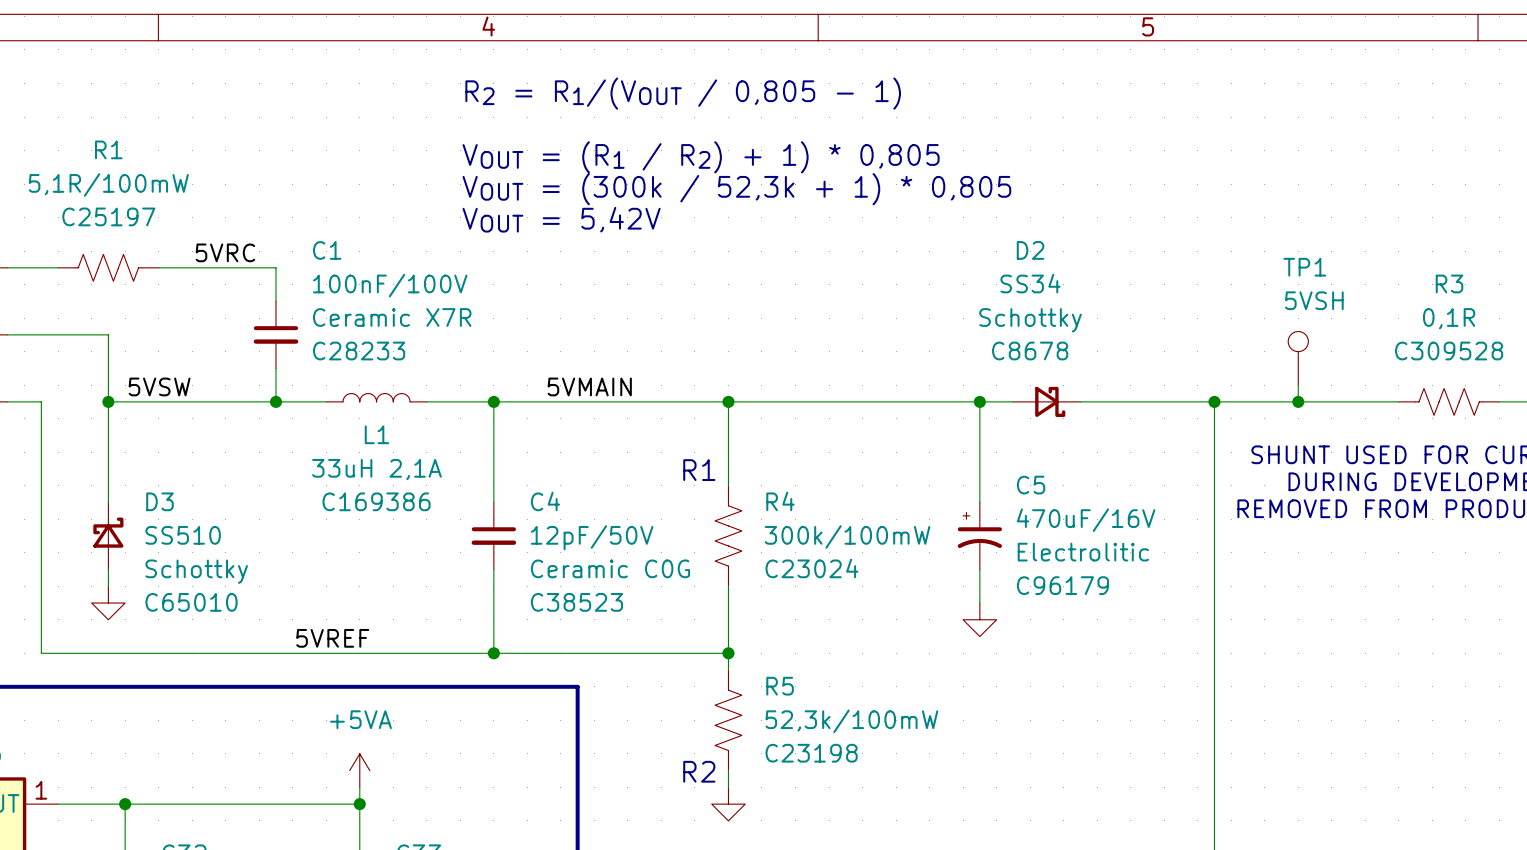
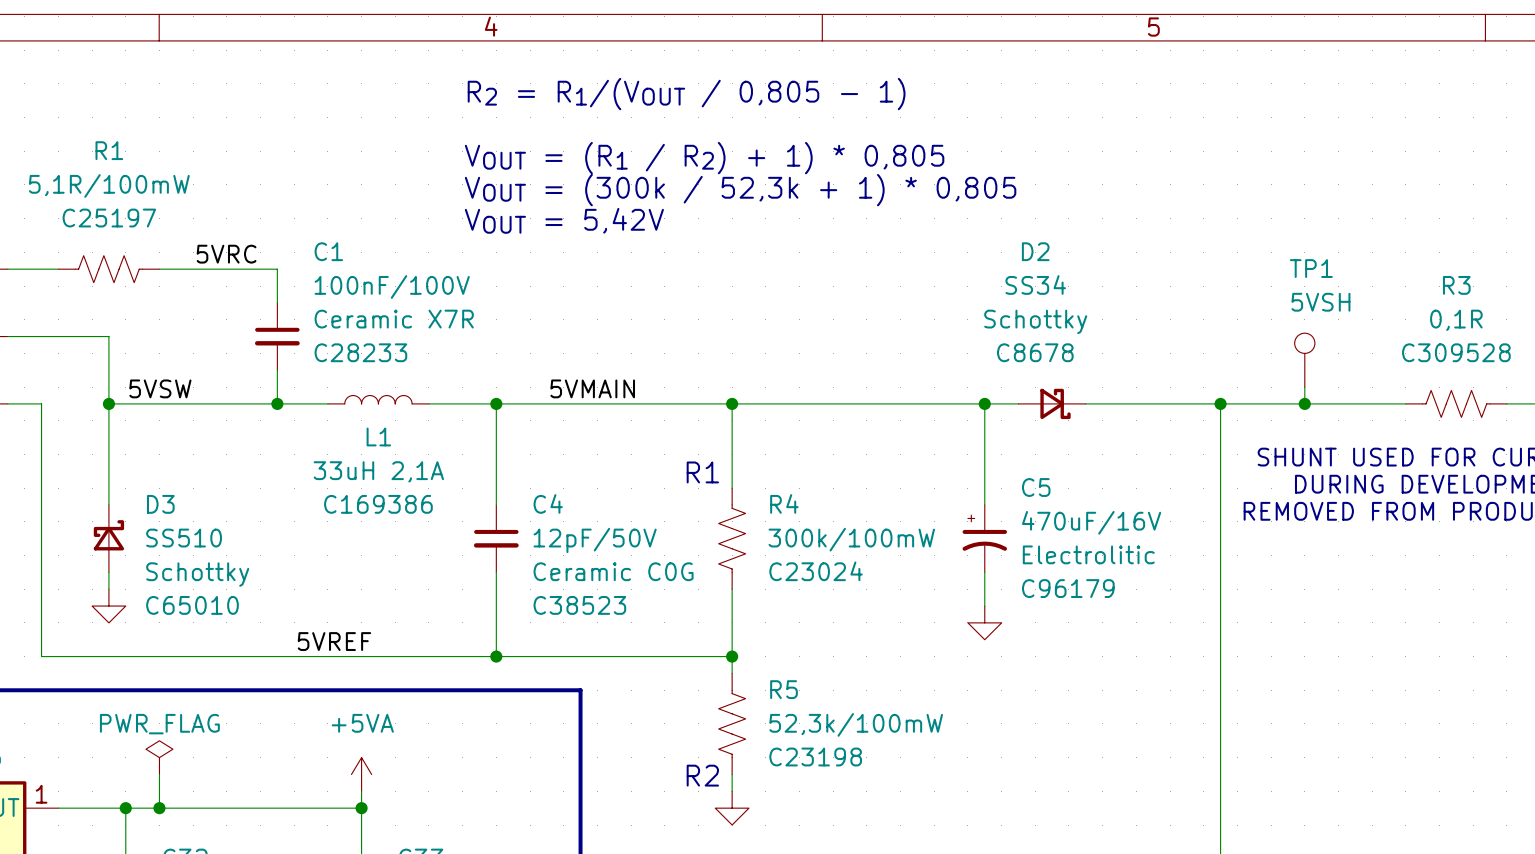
power symbol: none -> PWR_FLAG (159, 757)
wire: none -> (159, 774) (159, 808)
junction: none -> (159, 808)

